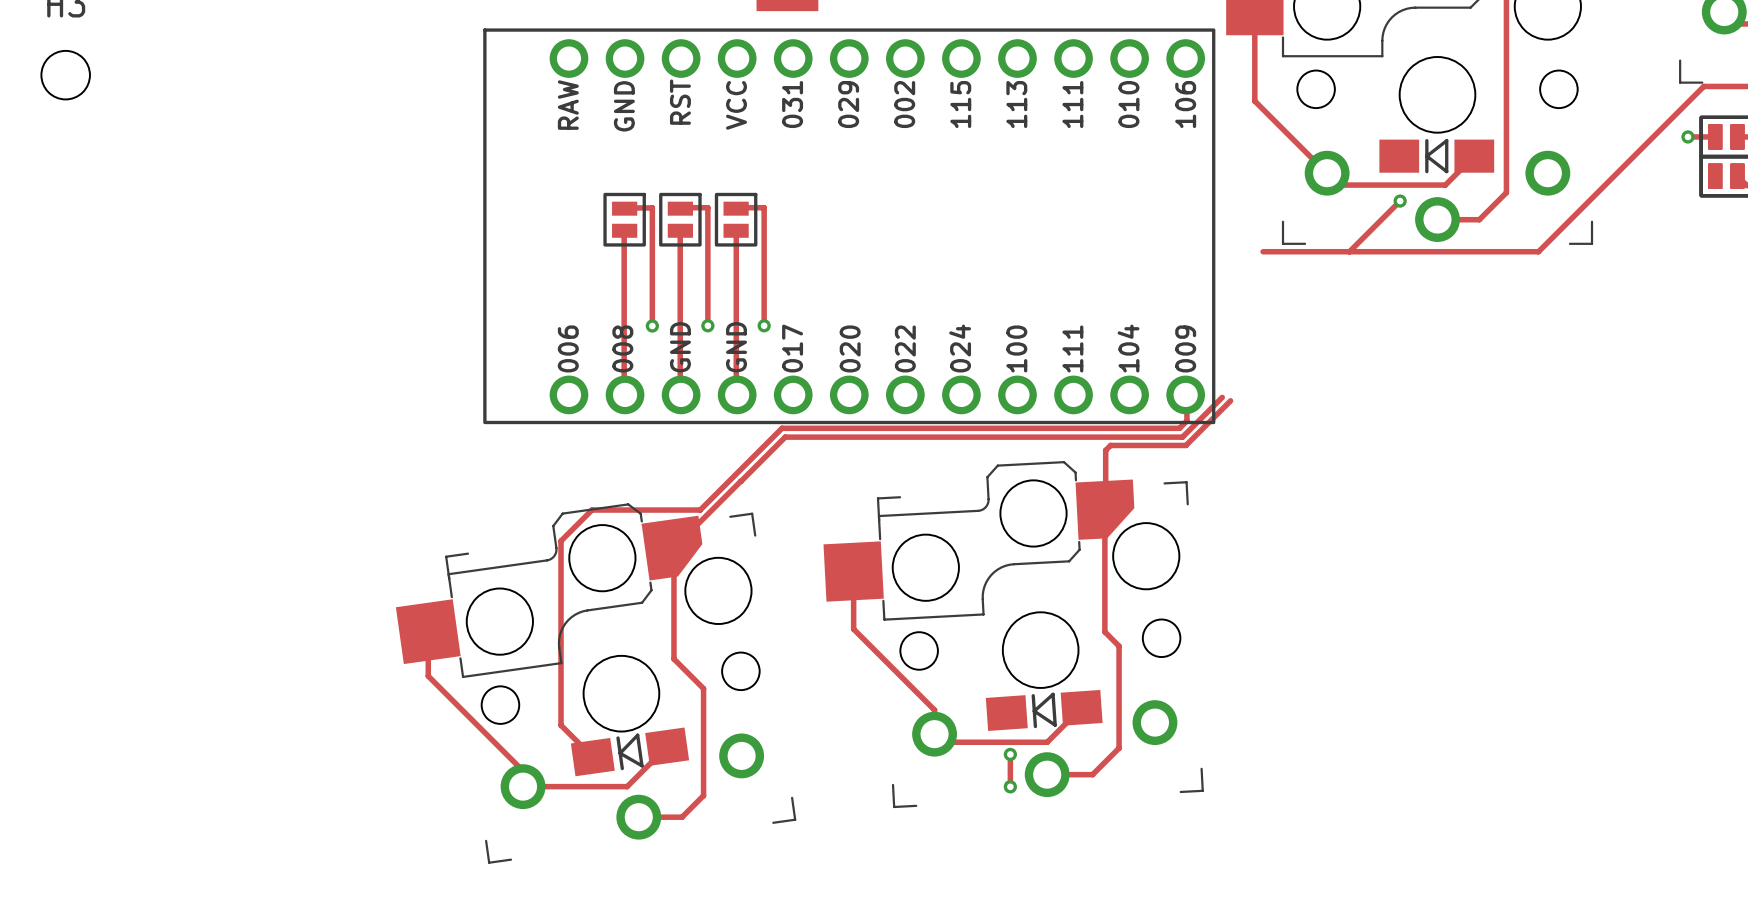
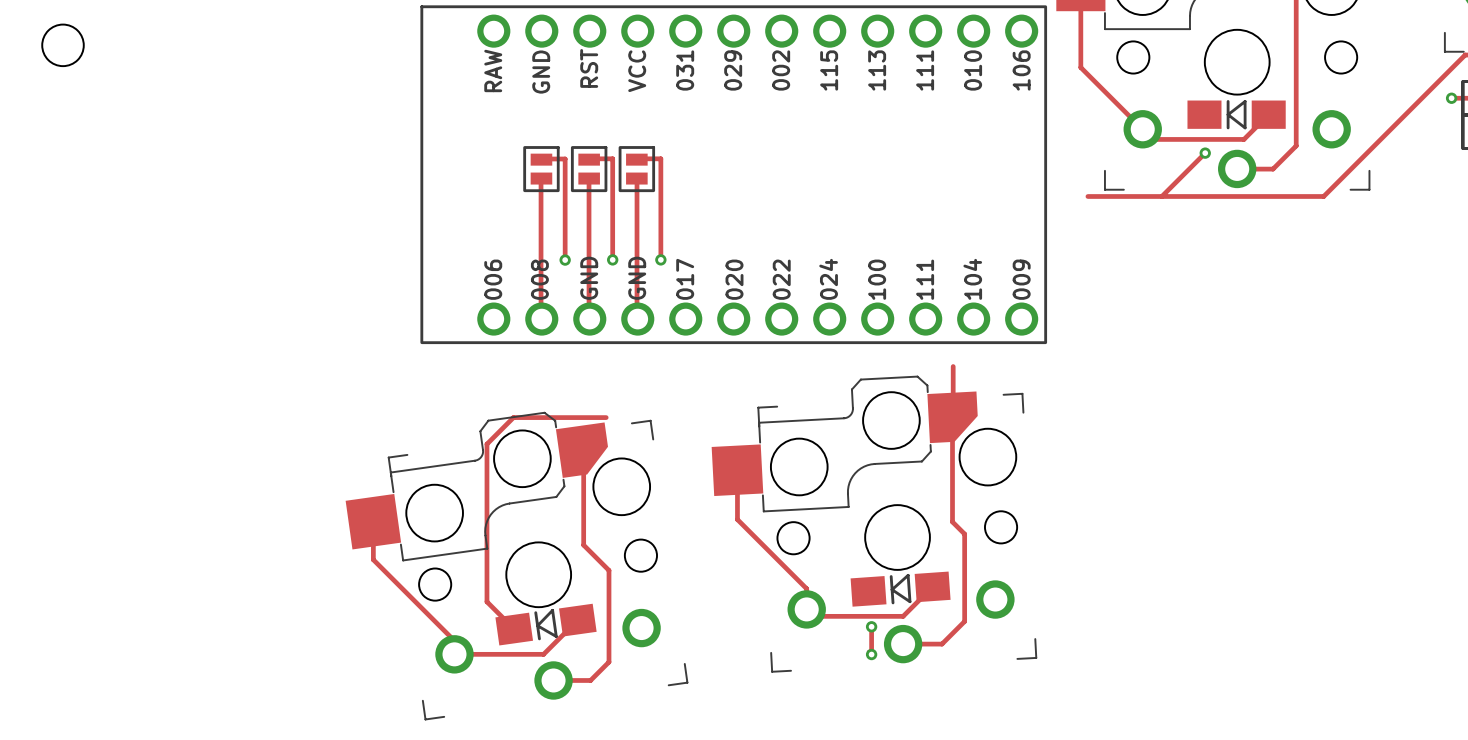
track: (1222, 397) (1182, 437) (785, 437) (741, 481) -> none
track: (1186, 399) (1186, 420) (1179, 428) (782, 428) (700, 510) -> none
track: (1230, 400) (1185, 445) (1110, 445) (1105, 450) -> none
track: (740, 481) (673, 548) -> none

